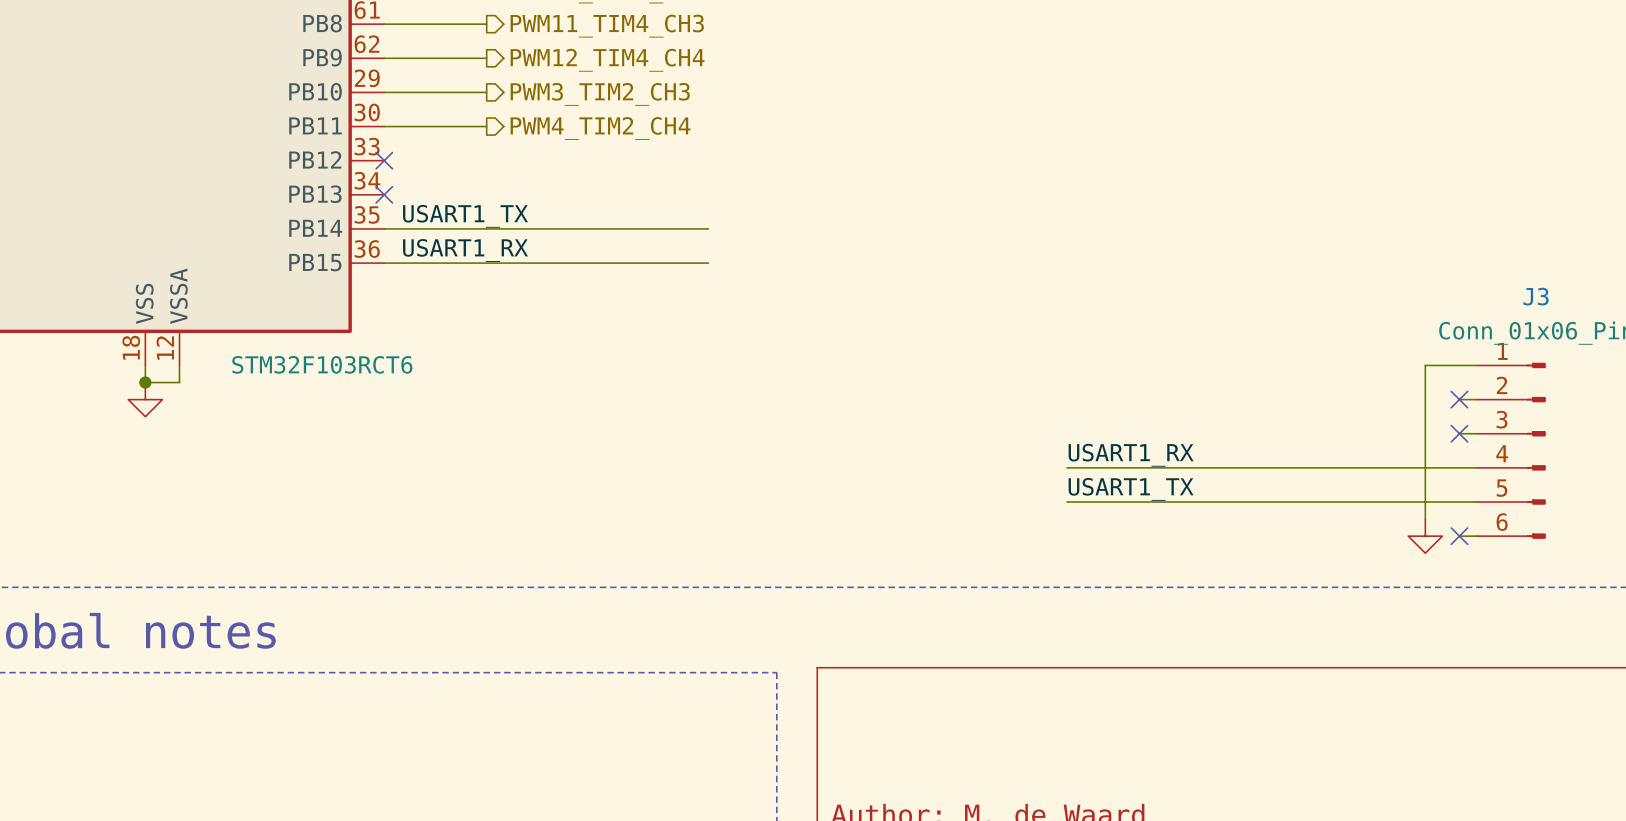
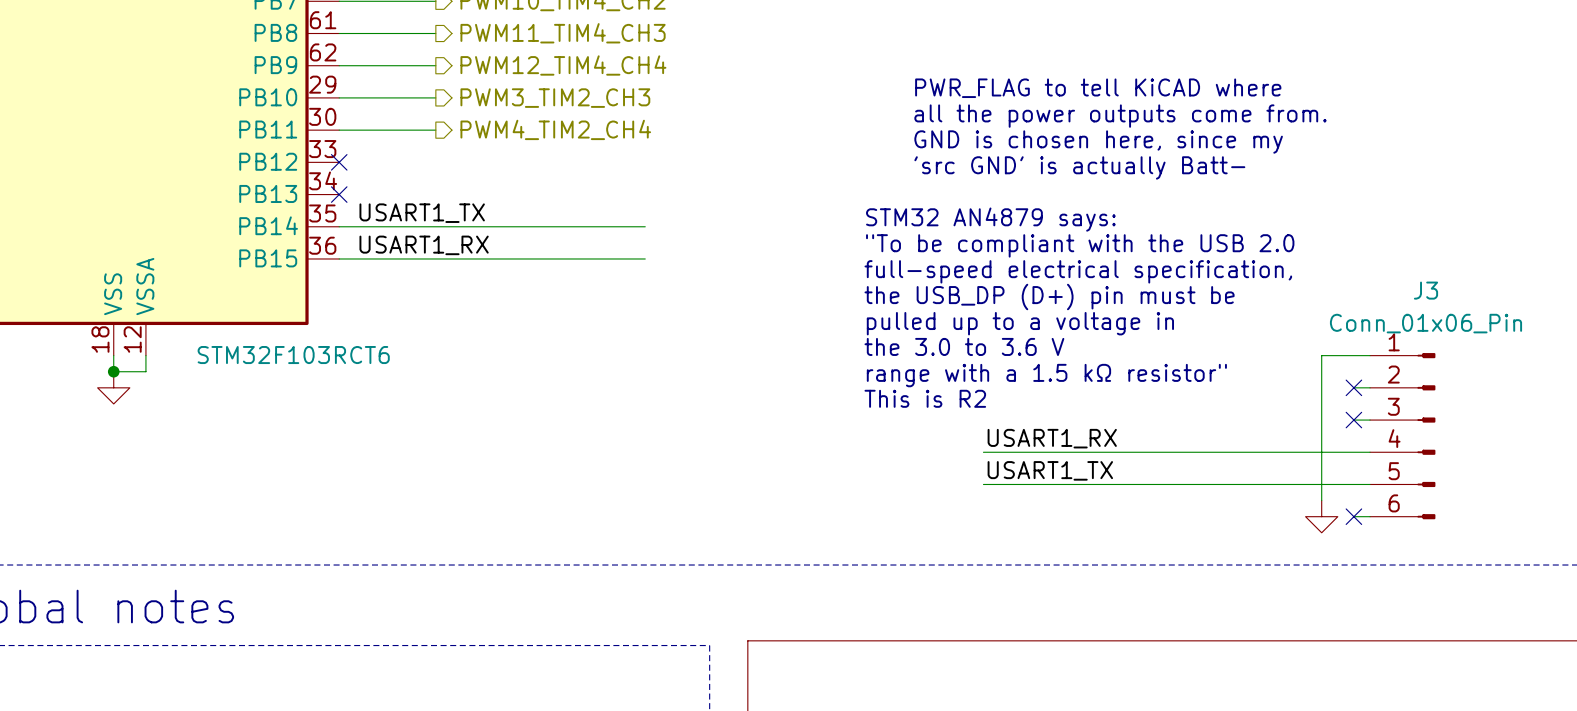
text: none -> PWR_FLAG to tell KiCAD where (1098, 88)
text: none -> all the power outputs come from. (1120, 116)
text: none -> GND is chosen here, since my (1098, 142)
text: none -> 'src GND' is actually Batt- (1079, 167)
text: none -> STM32 AN4879 says: (990, 219)
text: none -> "To be compliant with the USB 2.0 (1080, 245)
text: none -> full-speed electrical specification, (1078, 271)
text: none -> the USB_DP (D+) pin must be (1049, 296)
text: none -> pulled up to a voltage in (1020, 323)
text: none -> the 3.0 to 3.6 V (964, 346)
text: none -> range with a 1.5 kΩ resistor" (1046, 375)
text: none -> This is R2 (925, 398)

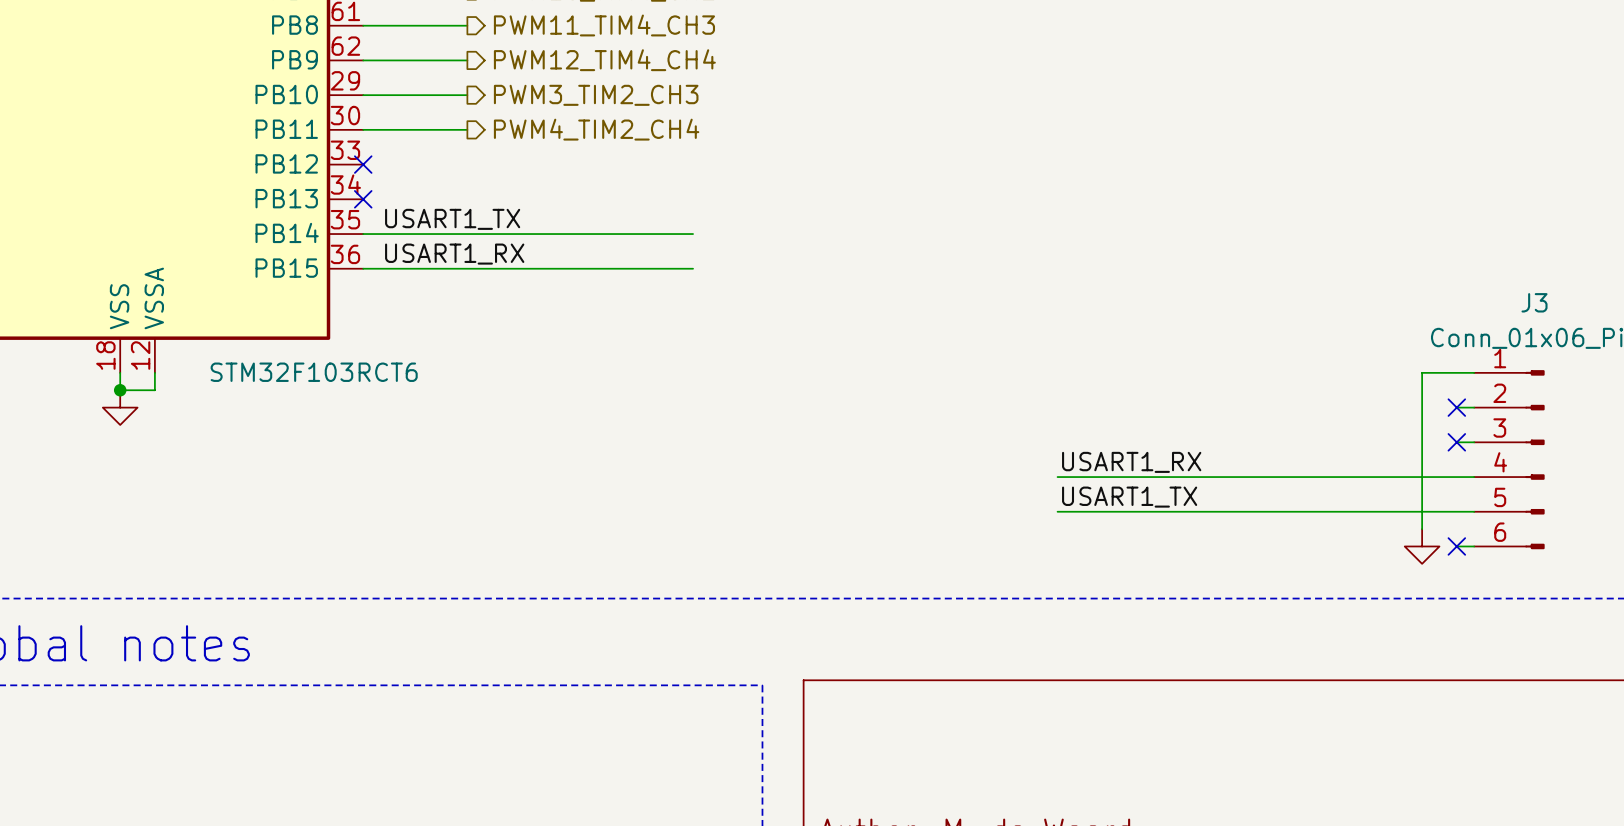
text: PWR_FLAG to tell KiCAD where (1098, 88) -> none
text: all the power outputs come from. (1120, 116) -> none
text: GND is chosen here, since my (1098, 142) -> none
text: 'src GND' is actually Batt- (1079, 167) -> none
text: STM32 AN4879 says: (990, 219) -> none
text: "To be compliant with the USB 2.0 (1080, 245) -> none
text: full-speed electrical specification, (1078, 271) -> none
text: the USB_DP (D+) pin must be (1049, 296) -> none
text: pulled up to a voltage in (1020, 323) -> none
text: the 3.0 to 3.6 V (964, 346) -> none
text: range with a 1.5 kΩ resistor" (1046, 375) -> none
text: This is R2 (925, 398) -> none

